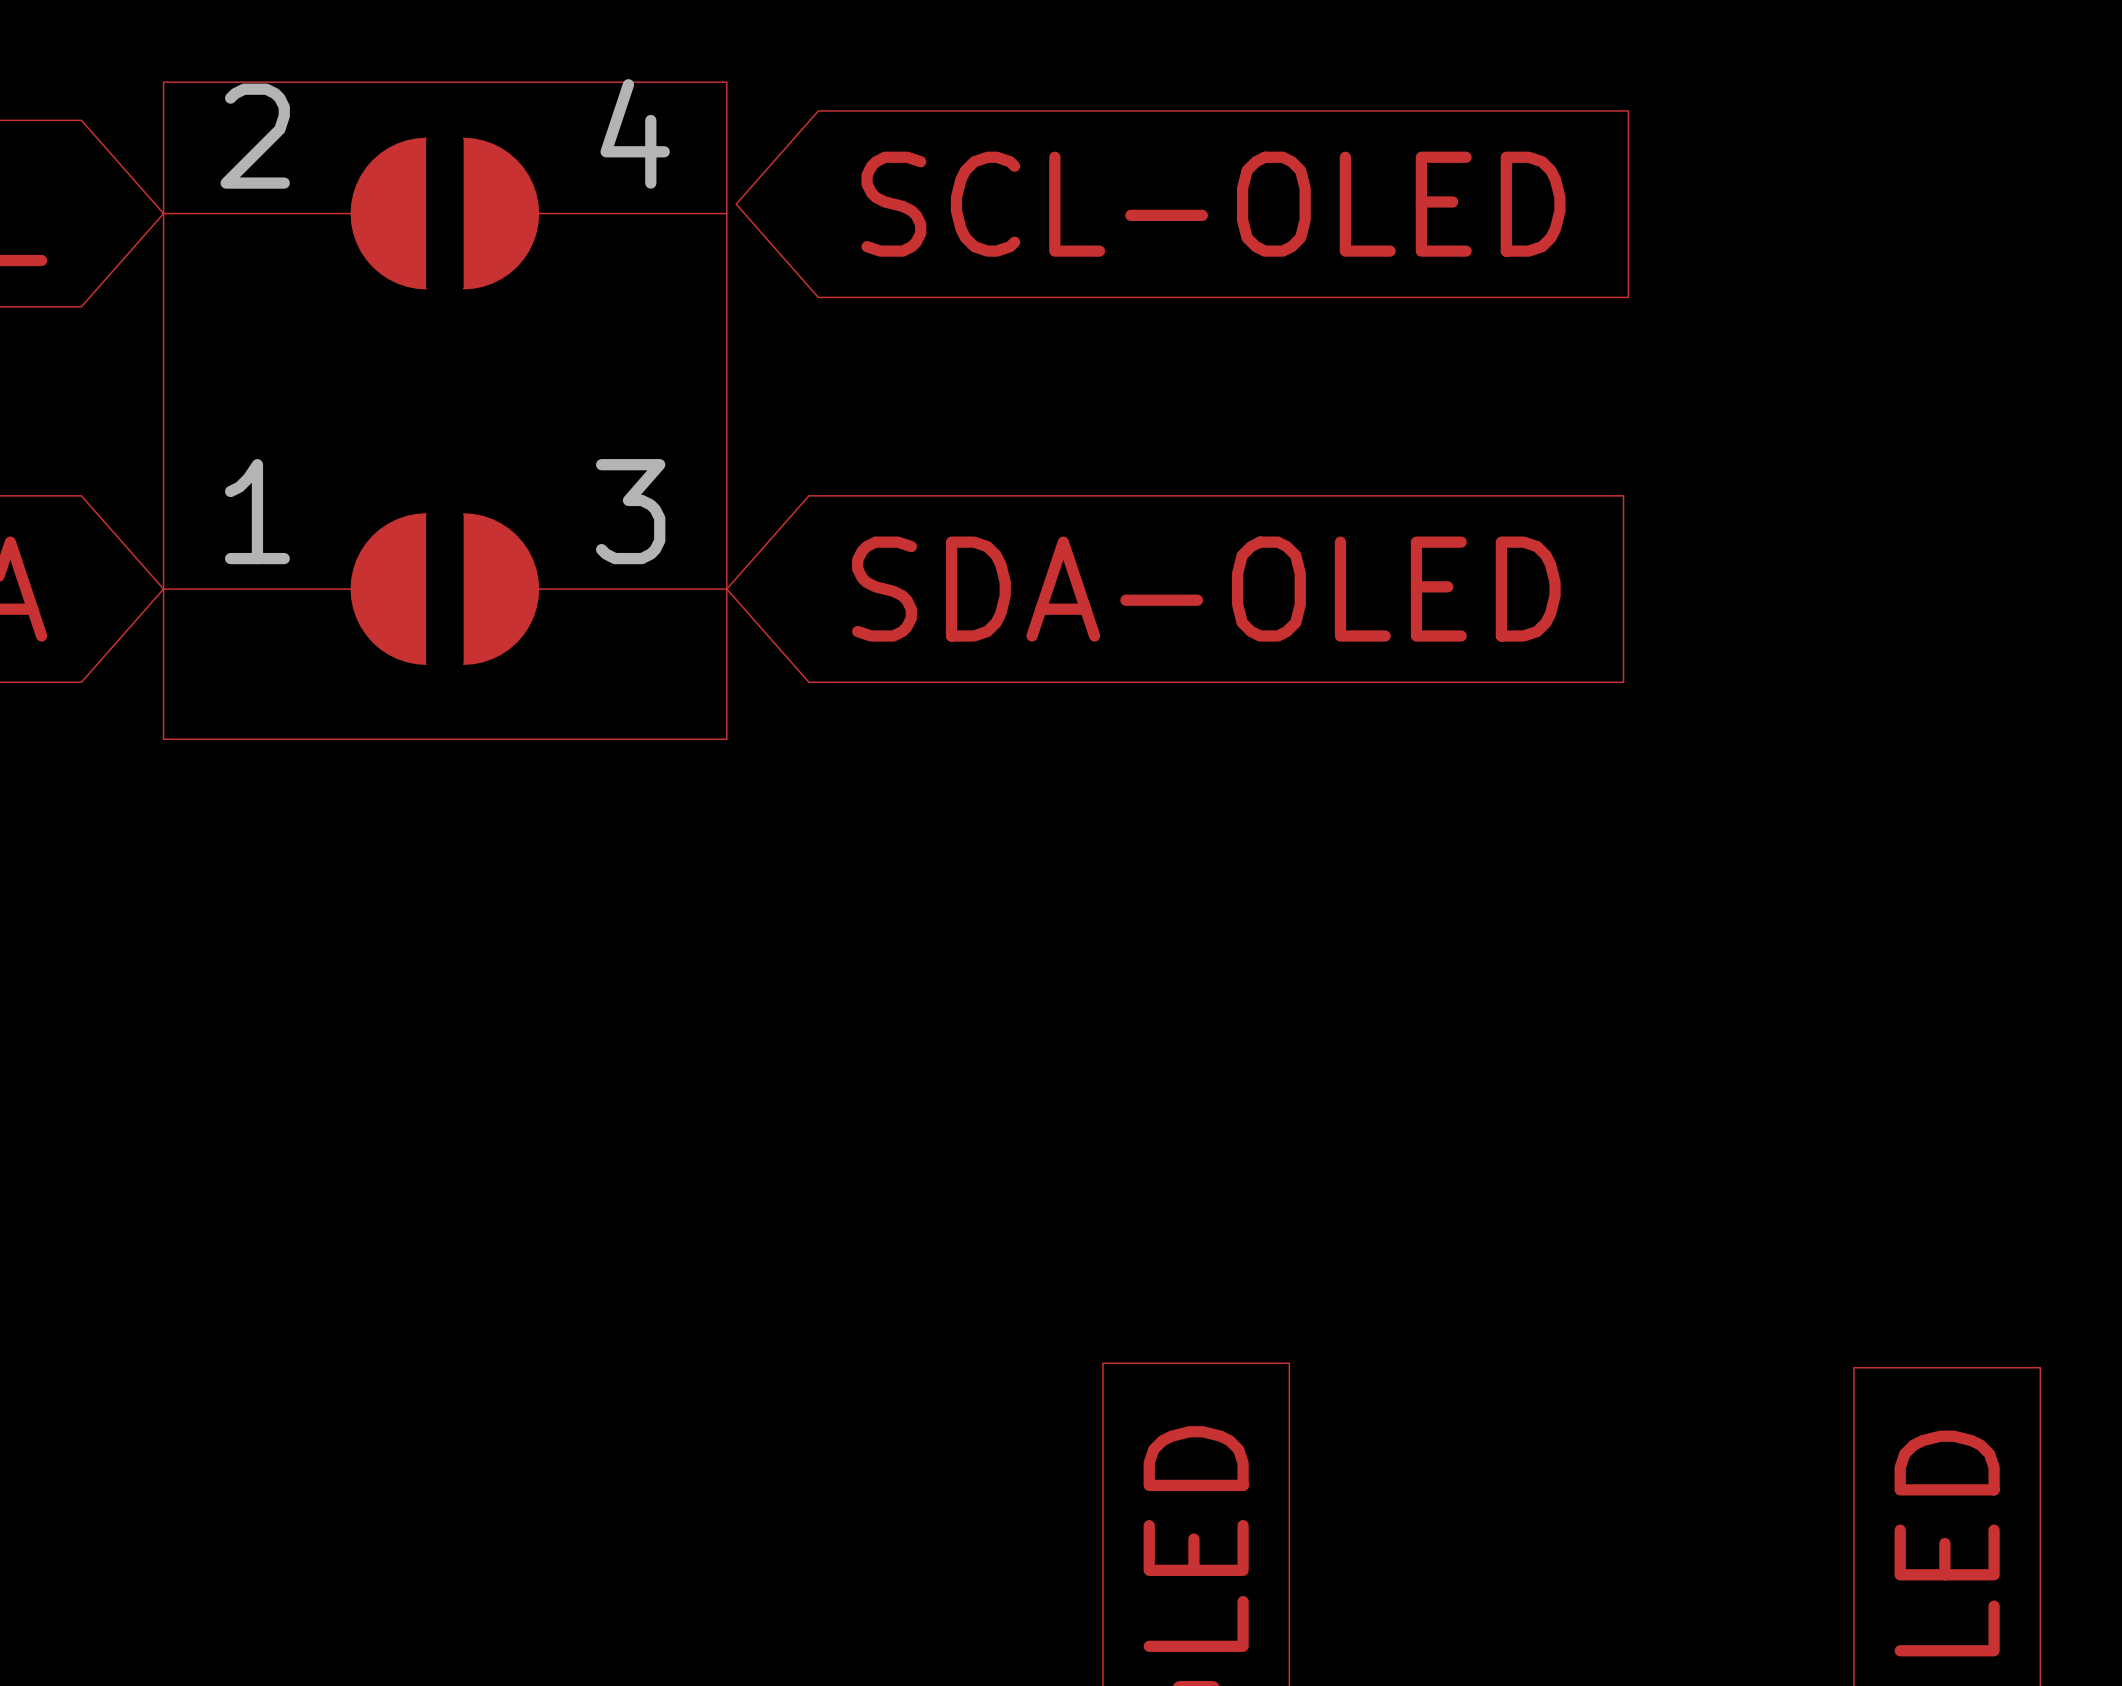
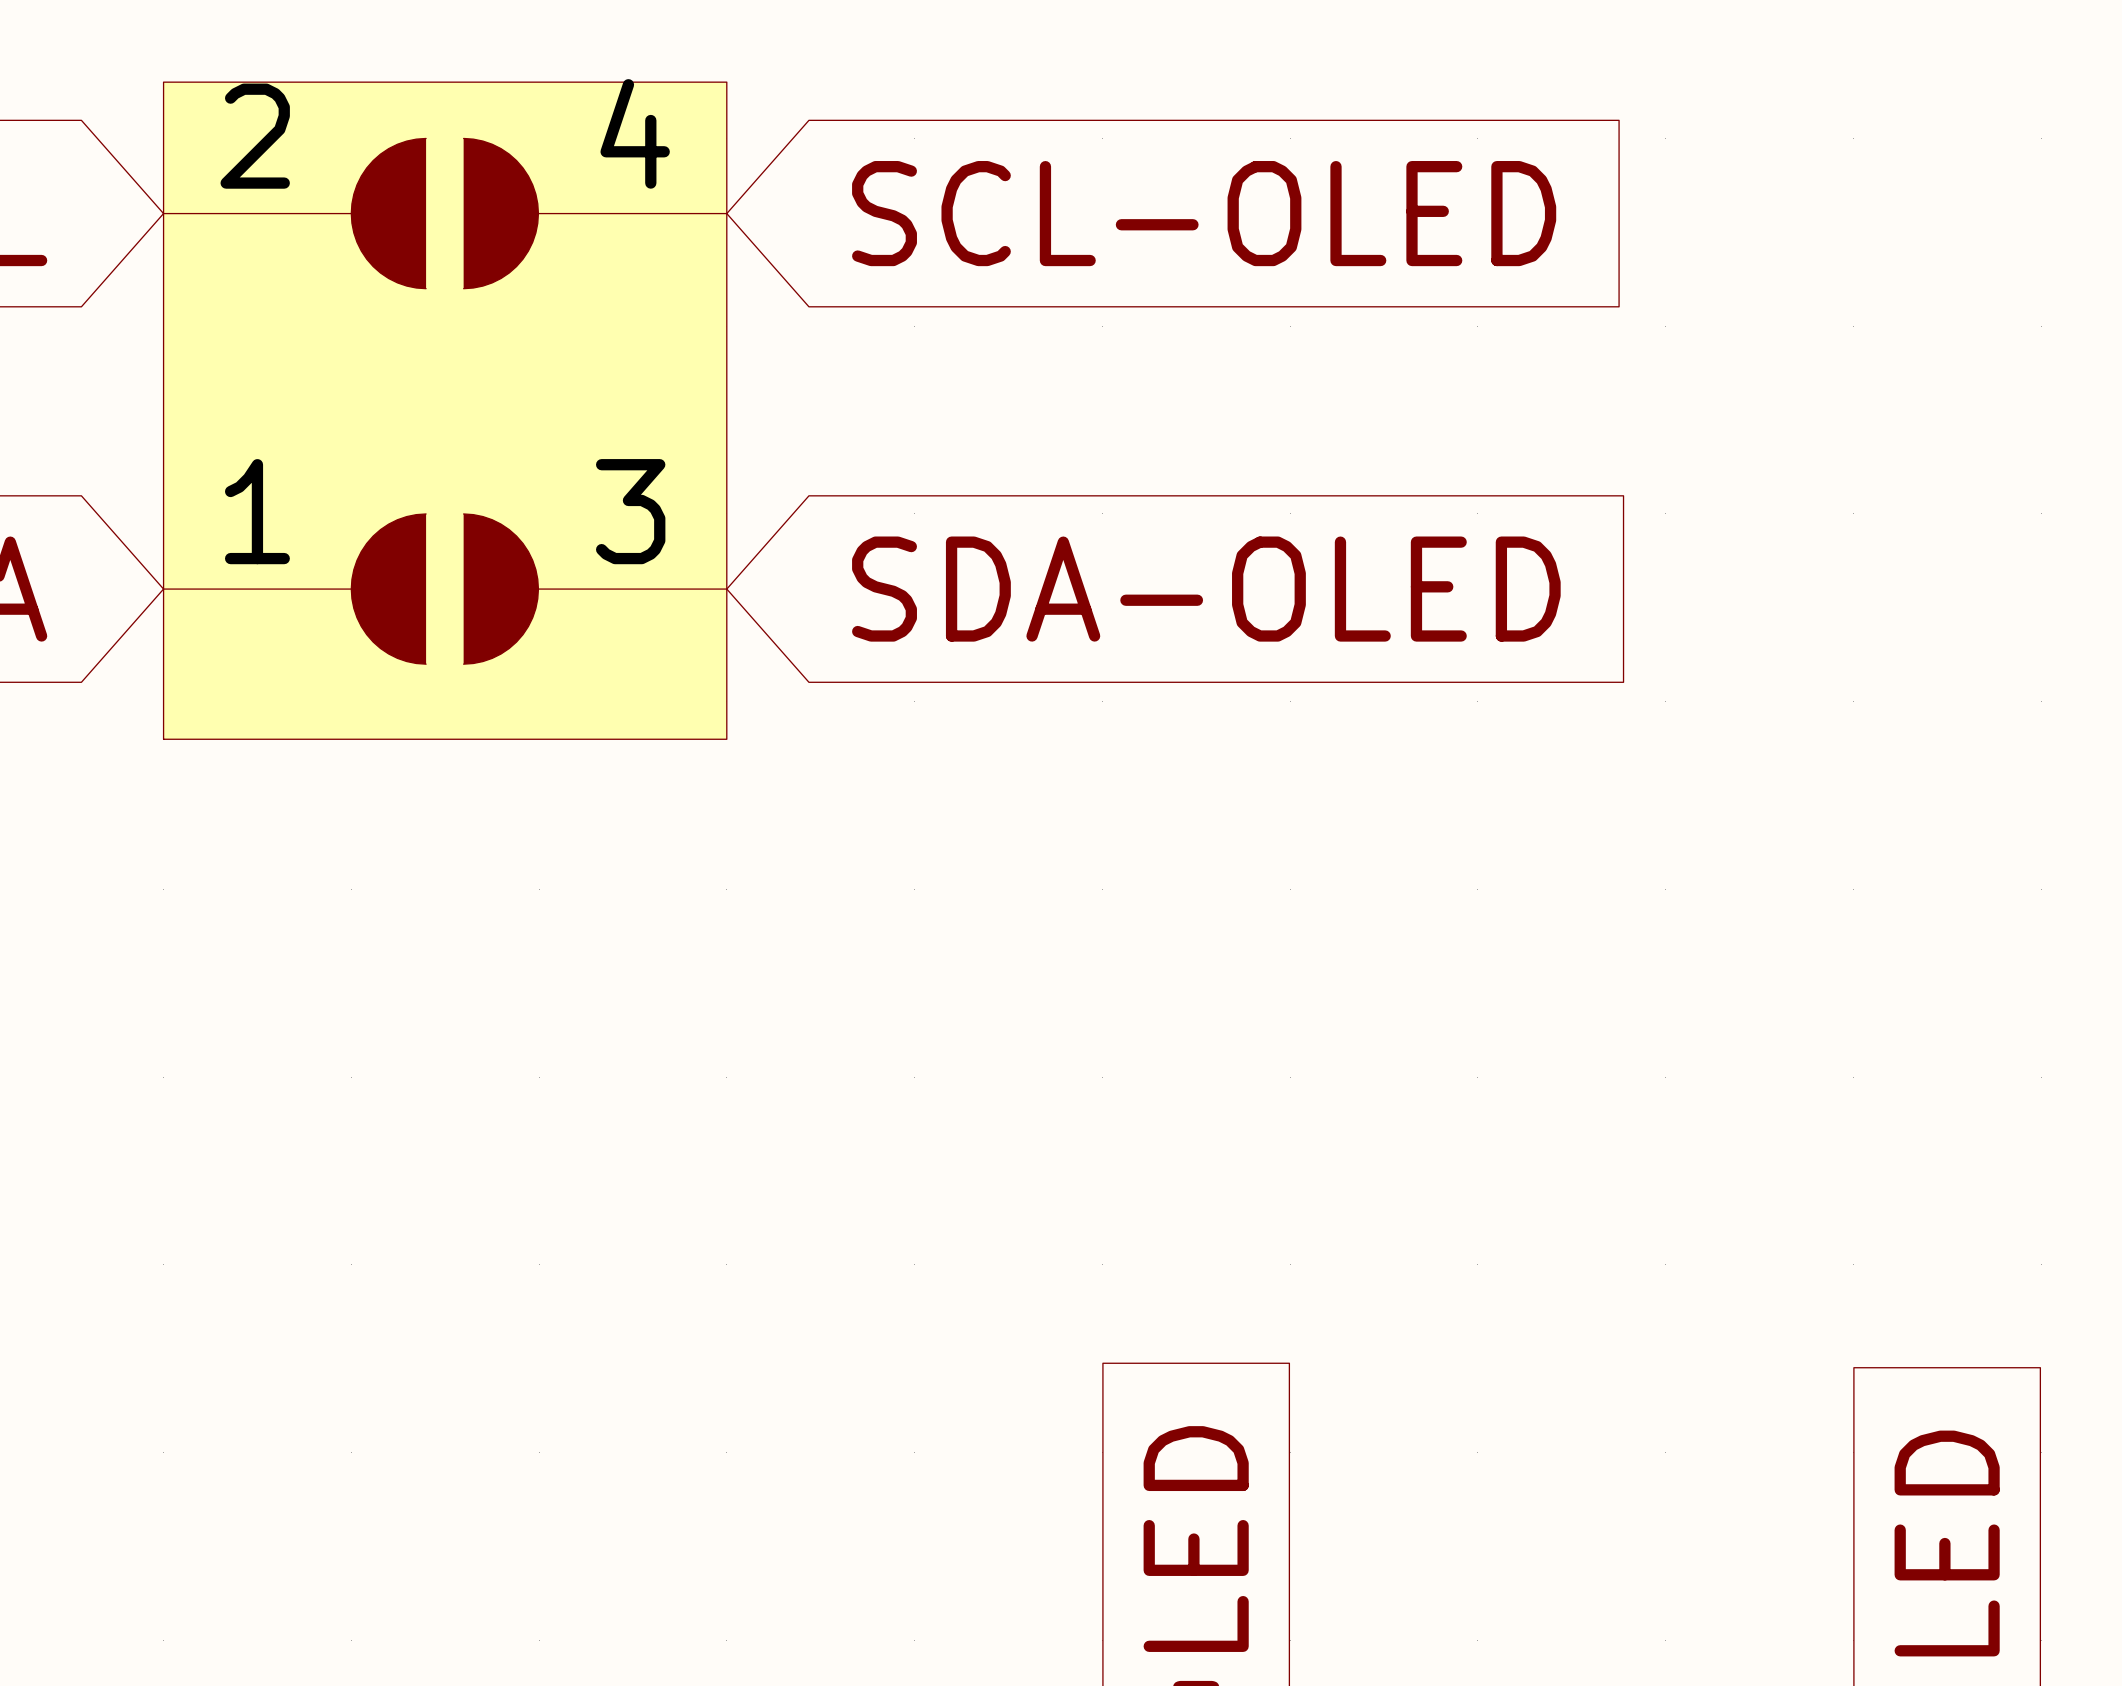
global label position: SCL-OLED (1213, 204) -> SCL-OLED (1204, 213)

